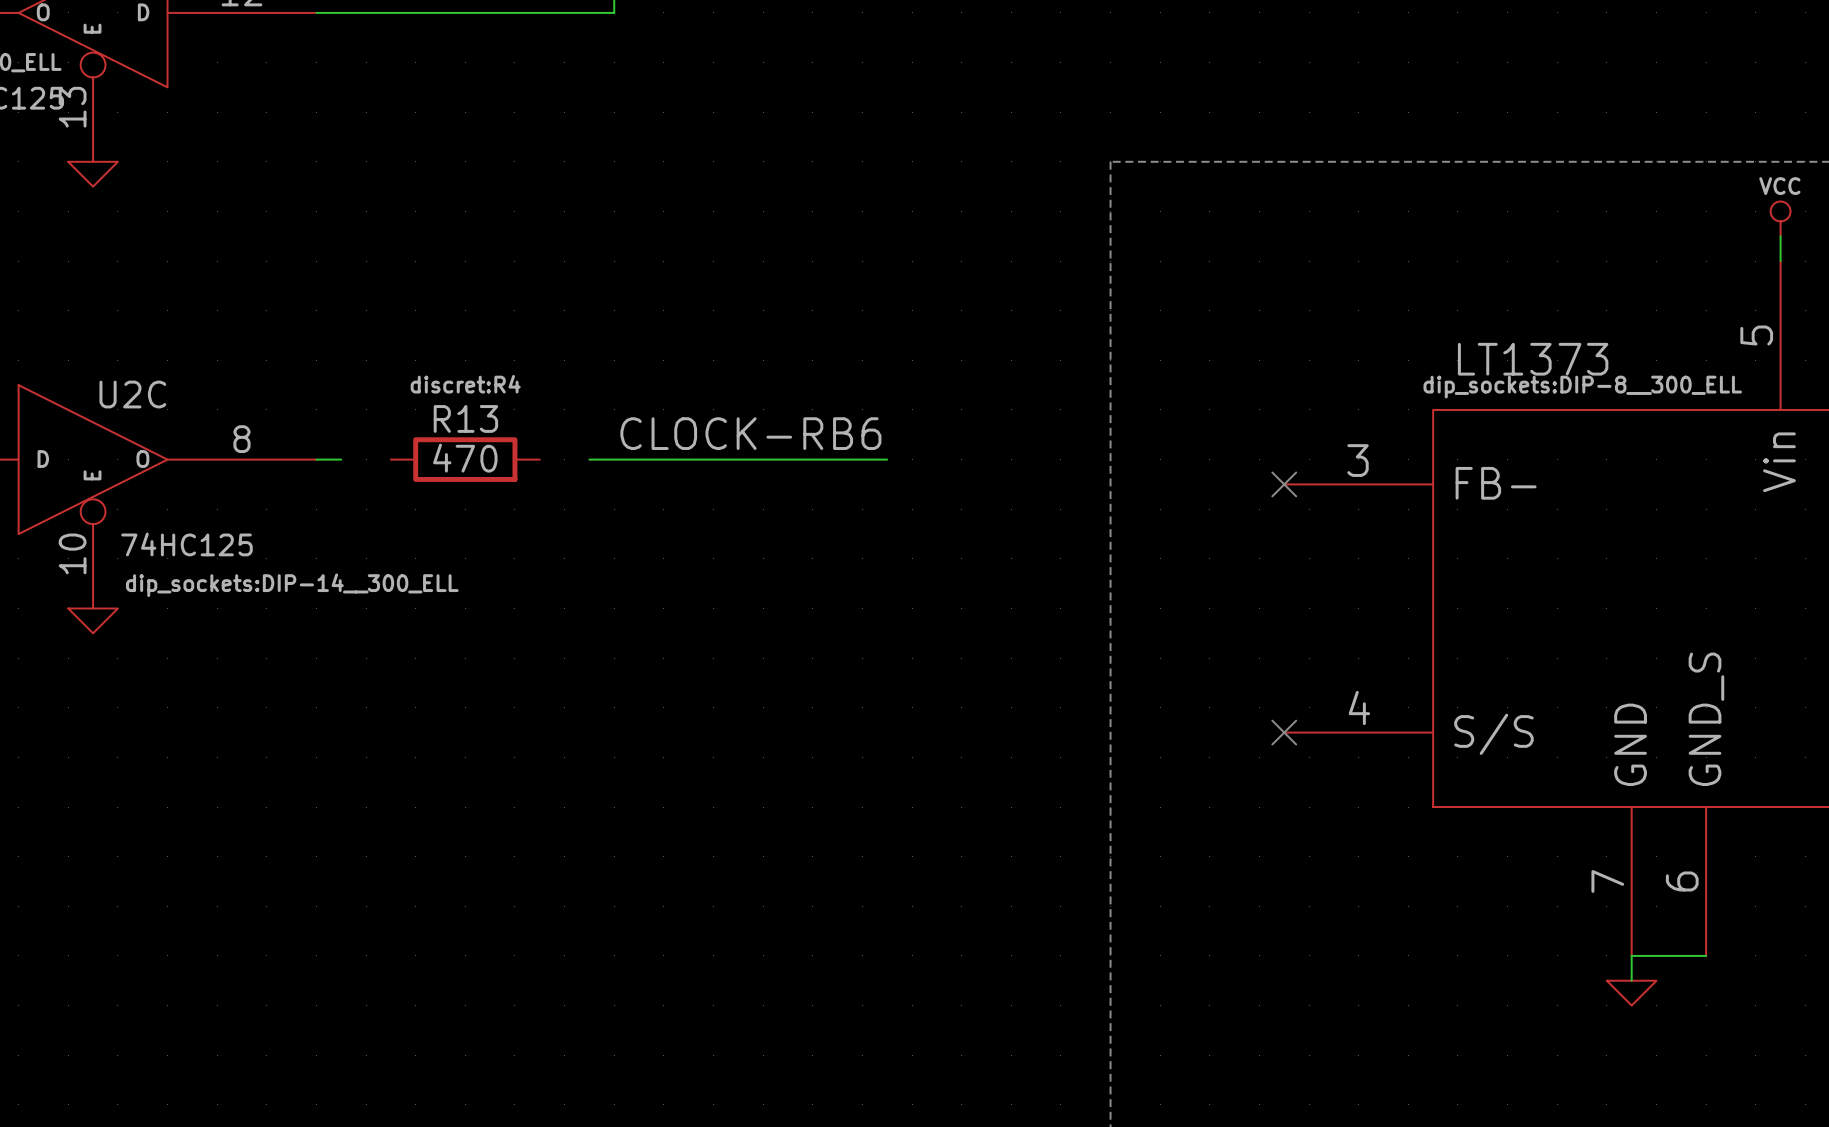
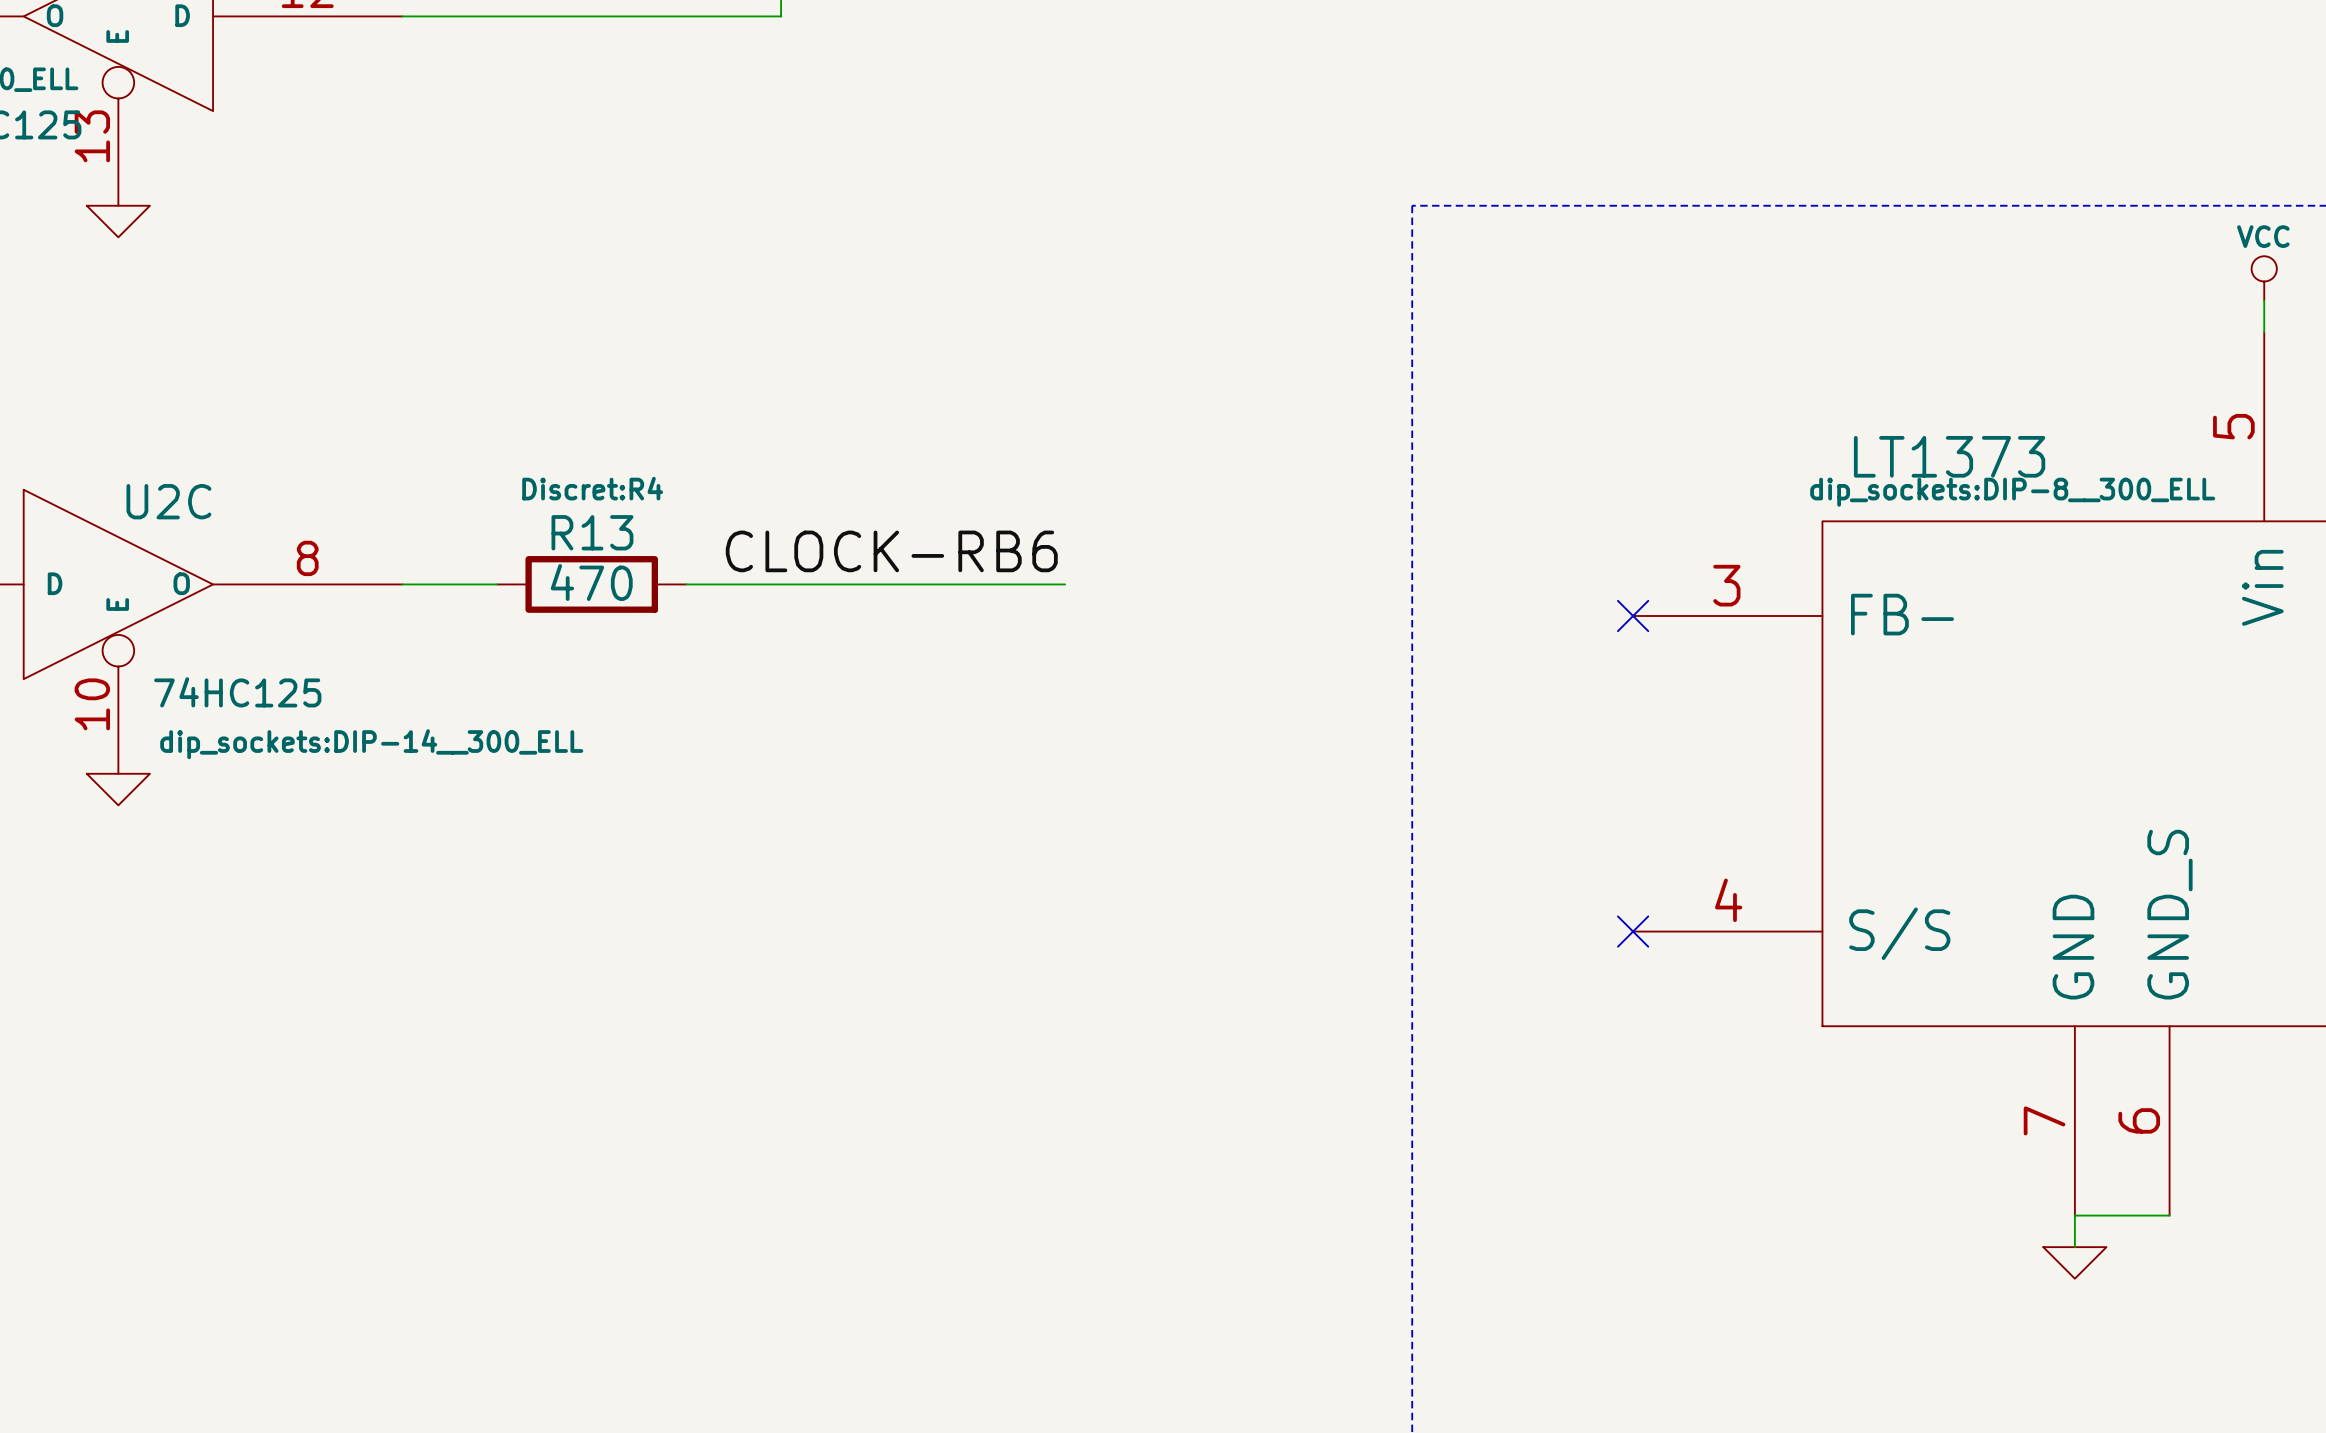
R13 text: discret:R4 (465, 384) -> Discret:R4 (592, 488)
label position: CLOCK-RB6 (750, 433) -> CLOCK-RB6 (891, 551)
wire: none -> (433, 584) (497, 584)
wire: (837, 459) (887, 459) -> (686, 584) (749, 584)

